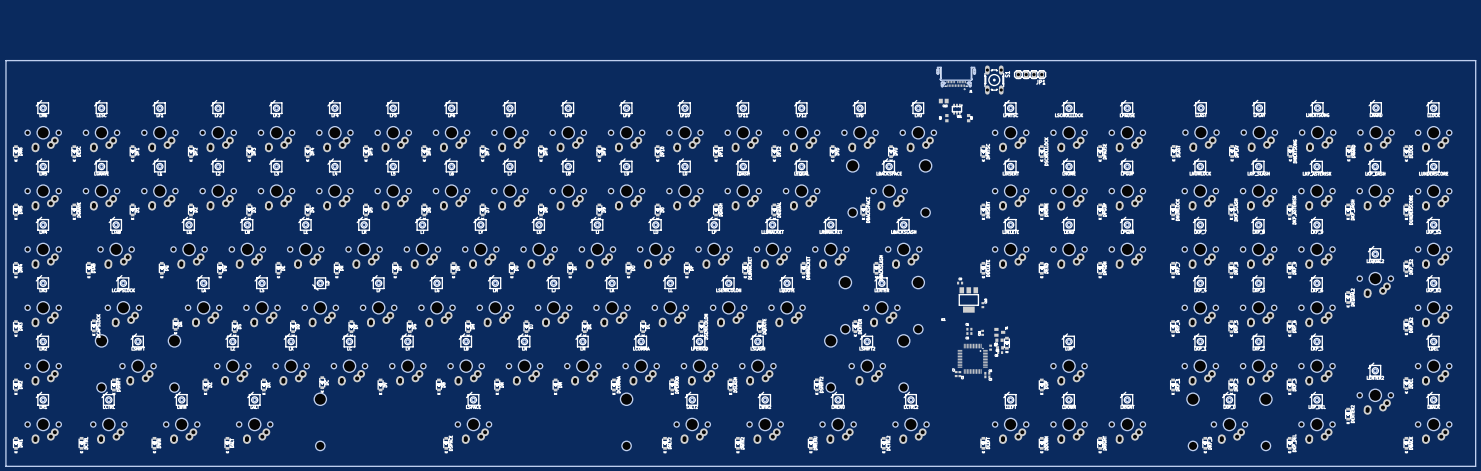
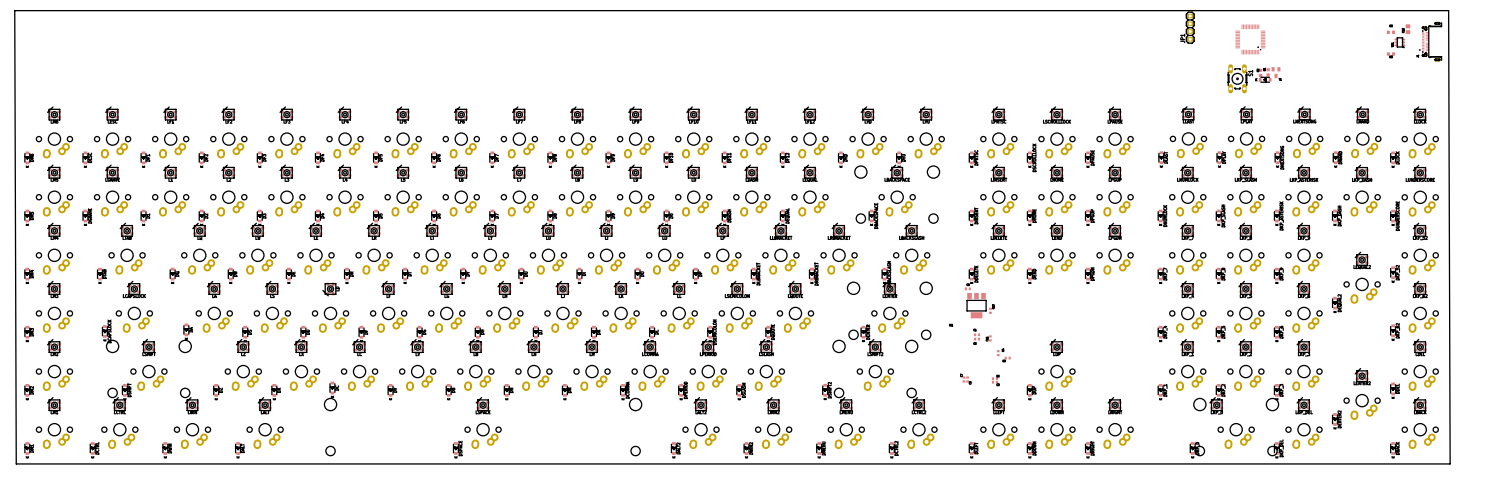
part: none -> (1250, 39)
board edge: (5, 60) (1475, 60) (1475, 466) (5, 466) (5, 60) -> (14, 10) (16, 463) (1450, 463) (1448, 10) (14, 10)
part: none -> (1265, 79)
part rotation: 0° (1030, 74) -> 90° clockwise (1190, 27)
part position: (1030, 74) -> (1190, 27)
part rotation: 0° (956, 78) -> 90° clockwise (1430, 41)
part position: (956, 78) -> (1430, 41)
part position: (994, 80) -> (1237, 78)
part footprint: [36, 100, 49, 114] -> [47, 106, 61, 121]
part footprint: [94, 100, 108, 114] -> [105, 106, 119, 121]
part footprint: [152, 100, 166, 114] -> [163, 106, 178, 121]
part footprint: [211, 100, 224, 114] -> [221, 106, 236, 121]
part footprint: [269, 100, 283, 114] -> [279, 106, 294, 121]
part footprint: [327, 100, 341, 114] -> [337, 106, 352, 121]
part footprint: [386, 100, 399, 114] -> [396, 106, 410, 121]
part footprint: [444, 100, 458, 114] -> [454, 106, 468, 121]
part footprint: [502, 100, 516, 114] -> [512, 106, 526, 121]
part footprint: [561, 100, 574, 114] -> [570, 106, 584, 121]
part footprint: [619, 100, 633, 114] -> [628, 106, 643, 121]
part footprint: [677, 100, 691, 114] -> [686, 106, 701, 121]
part footprint: [736, 100, 749, 114] -> [744, 106, 759, 121]
part footprint: [794, 100, 808, 114] -> [802, 106, 817, 121]
part footprint: [852, 100, 866, 114] -> [861, 106, 875, 121]
part footprint: [911, 100, 924, 114] -> [919, 106, 933, 121]
part rotation: 0° (943, 101) -> 90° clockwise (1407, 29)
part position: (943, 101) -> (1407, 29)
part: none -> (1188, 113)
part: (1200, 106) -> none
part: none -> (1246, 113)
part: (1258, 106) -> none
part: none -> (1304, 113)
part: (1316, 106) -> none
part: none -> (1362, 113)
part: (1375, 106) -> none
part: none -> (998, 113)
part: (1009, 107) -> none
part: none -> (1056, 113)
part: (1068, 107) -> none
part: none -> (1114, 113)
part: (1126, 107) -> none
part: none -> (1419, 113)
part: (1432, 107) -> none
part rotation: 0° (957, 109) -> 90° clockwise (1399, 42)
part position: (957, 109) -> (1399, 42)
part rotation: 0° (946, 118) -> 90° clockwise (1390, 32)
part position: (946, 118) -> (1390, 32)
part rotation: 0° (968, 118) -> 90° clockwise (1390, 54)
part position: (968, 118) -> (1390, 54)
part: none -> (998, 145)
part: (1010, 139) -> none
part: none -> (1056, 145)
part: (1069, 139) -> none
part: none -> (1115, 145)
part: (1127, 139) -> none
part: none -> (1188, 145)
part: (1201, 139) -> none
part: none -> (1246, 145)
part: (1259, 139) -> none
part: none -> (1304, 145)
part: (1317, 139) -> none
part: none -> (1362, 145)
part: (1376, 139) -> none
part: none -> (1420, 145)
part: (1433, 139) -> none
part position: (983, 151) -> (971, 157)
part position: (1041, 151) -> (1029, 157)
part position: (1100, 151) -> (1087, 157)
part position: (1173, 151) -> (1161, 157)
part position: (1232, 151) -> (1219, 157)
part position: (1290, 151) -> (1277, 157)
part position: (1348, 151) -> (1335, 157)
part position: (1406, 151) -> (1393, 157)
part footprint: [36, 158, 49, 173] -> [47, 164, 61, 179]
part footprint: [94, 158, 108, 173] -> [105, 164, 119, 179]
part footprint: [152, 158, 166, 173] -> [163, 164, 178, 179]
part footprint: [211, 158, 224, 173] -> [221, 164, 236, 179]
part footprint: [269, 158, 283, 173] -> [279, 164, 294, 179]
part footprint: [327, 158, 341, 173] -> [337, 164, 352, 179]
part footprint: [386, 158, 399, 173] -> [396, 164, 410, 179]
part footprint: [444, 158, 458, 173] -> [454, 164, 468, 179]
part footprint: [502, 158, 516, 173] -> [512, 164, 526, 179]
part footprint: [561, 158, 574, 173] -> [570, 164, 584, 179]
part footprint: [619, 158, 633, 173] -> [628, 164, 643, 179]
part footprint: [677, 158, 691, 173] -> [686, 164, 701, 179]
part footprint: [736, 158, 749, 173] -> [744, 164, 759, 179]
part footprint: [794, 158, 808, 173] -> [802, 164, 817, 179]
part footprint: [882, 158, 895, 173] -> [890, 164, 904, 179]
part: none -> (998, 171)
part: (1009, 165) -> none
part: none -> (1056, 171)
part: (1068, 165) -> none
part: none -> (1114, 171)
part: (1126, 165) -> none
part: none -> (1187, 171)
part: (1199, 165) -> none
part: none -> (1245, 171)
part: (1257, 165) -> none
part: none -> (1303, 171)
part: (1316, 165) -> none
part: none -> (1361, 171)
part: (1374, 165) -> none
part: none -> (1419, 171)
part: (1432, 165) -> none
part: none -> (998, 203)
part: (1010, 197) -> none
part: none -> (1056, 203)
part: (1069, 197) -> none
part: none -> (1115, 203)
part: (1127, 197) -> none
part: none -> (1187, 203)
part: (1200, 197) -> none
part: none -> (1245, 203)
part: (1258, 197) -> none
part: none -> (1304, 203)
part: (1316, 197) -> none
part: none -> (1362, 203)
part: (1375, 197) -> none
part: none -> (1420, 203)
part: (1433, 197) -> none
part position: (983, 209) -> (971, 216)
part position: (1041, 209) -> (1029, 216)
part position: (1100, 209) -> (1087, 216)
part position: (1173, 209) -> (1160, 216)
part position: (1231, 209) -> (1218, 216)
part position: (1289, 209) -> (1276, 216)
part position: (1348, 209) -> (1334, 216)
part position: (1406, 210) -> (1393, 216)
part footprint: [36, 217, 49, 231] -> [47, 223, 61, 237]
part footprint: [109, 217, 122, 231] -> [120, 223, 134, 237]
part footprint: [181, 217, 195, 231] -> [192, 223, 207, 237]
part footprint: [240, 217, 253, 231] -> [250, 223, 265, 237]
part footprint: [298, 217, 312, 231] -> [308, 223, 323, 237]
part footprint: [357, 217, 370, 231] -> [367, 223, 381, 237]
part footprint: [415, 217, 428, 231] -> [425, 223, 439, 237]
part footprint: [473, 217, 487, 231] -> [483, 223, 497, 237]
part footprint: [532, 217, 545, 231] -> [541, 223, 555, 237]
part footprint: [590, 217, 603, 231] -> [599, 223, 613, 237]
part footprint: [648, 217, 662, 231] -> [657, 223, 672, 237]
part footprint: [707, 217, 720, 231] -> [715, 223, 730, 237]
part footprint: [765, 217, 778, 231] -> [773, 223, 788, 237]
part footprint: [823, 217, 837, 231] -> [832, 223, 846, 237]
part footprint: [896, 217, 910, 231] -> [904, 223, 919, 237]
part footprint: [1193, 217, 1206, 231] -> [1180, 223, 1195, 237]
part footprint: [1251, 217, 1265, 231] -> [1238, 223, 1253, 237]
part footprint: [1309, 217, 1323, 231] -> [1296, 223, 1311, 237]
part footprint: [1426, 217, 1440, 231] -> [1413, 223, 1427, 237]
part: none -> (998, 229)
part: (1009, 223) -> none
part: none -> (1056, 229)
part: (1068, 223) -> none
part: none -> (1114, 229)
part: (1126, 223) -> none
part footprint: [1368, 246, 1381, 260] -> [1355, 252, 1369, 266]
part: none -> (998, 261)
part: (1010, 256) -> none
part: none -> (1056, 261)
part: (1069, 256) -> none
part: none -> (1115, 261)
part: (1127, 256) -> none
part: none -> (1187, 261)
part: (1200, 256) -> none
part: none -> (1245, 261)
part: (1258, 256) -> none
part: none -> (1304, 261)
part: (1316, 256) -> none
part position: (1433, 256) -> (1420, 261)
part position: (1406, 266) -> (1393, 272)
part position: (983, 268) -> (971, 274)
part position: (1041, 268) -> (1029, 274)
part position: (1100, 268) -> (1087, 274)
part position: (1173, 268) -> (1160, 274)
part position: (1231, 268) -> (1218, 274)
part position: (1289, 268) -> (1276, 274)
part footprint: [36, 275, 49, 289] -> [47, 281, 61, 295]
part footprint: [116, 275, 129, 289] -> [127, 281, 141, 295]
part footprint: [196, 275, 210, 289] -> [207, 281, 221, 295]
part footprint: [254, 275, 268, 289] -> [265, 281, 279, 295]
part footprint: [371, 275, 385, 289] -> [381, 281, 396, 295]
part footprint: [429, 275, 443, 289] -> [439, 281, 454, 295]
part footprint: [488, 275, 501, 289] -> [497, 281, 512, 295]
part footprint: [546, 275, 560, 289] -> [555, 281, 570, 295]
part footprint: [604, 275, 618, 289] -> [614, 281, 628, 295]
part footprint: [663, 275, 676, 289] -> [672, 281, 686, 295]
part footprint: [721, 275, 735, 289] -> [730, 281, 744, 295]
part footprint: [779, 275, 793, 289] -> [788, 281, 802, 295]
part footprint: [874, 275, 888, 289] -> [882, 281, 897, 295]
part footprint: [1193, 275, 1206, 289] -> [1180, 281, 1195, 295]
part footprint: [1251, 275, 1265, 289] -> [1238, 281, 1253, 295]
part footprint: [1309, 275, 1323, 289] -> [1296, 281, 1311, 295]
part footprint: [1426, 275, 1440, 289] -> [1413, 281, 1427, 295]
part footprint: [312, 277, 326, 291] -> [322, 282, 336, 297]
part position: (1375, 285) -> (1362, 291)
part position: (1348, 297) -> (1334, 303)
part: none -> (1187, 320)
part: (1200, 314) -> none
part: none -> (1245, 320)
part: (1258, 314) -> none
part: none -> (1304, 320)
part: (1316, 314) -> none
part position: (1433, 314) -> (1420, 320)
part position: (1406, 325) -> (1393, 330)
part position: (1173, 326) -> (1160, 332)
part position: (1231, 326) -> (1218, 332)
part position: (1289, 326) -> (1276, 332)
part rotation: 0° (999, 332) -> 90° clockwise (1276, 72)
part position: (999, 332) -> (1276, 72)
part footprint: [36, 333, 49, 348] -> [47, 339, 61, 353]
part footprint: [130, 333, 144, 348] -> [141, 339, 156, 353]
part footprint: [225, 333, 239, 348] -> [236, 339, 250, 353]
part footprint: [284, 333, 297, 348] -> [294, 339, 308, 353]
part footprint: [342, 333, 355, 348] -> [352, 339, 366, 353]
part footprint: [400, 333, 414, 348] -> [410, 339, 425, 353]
part footprint: [459, 333, 472, 348] -> [468, 339, 483, 353]
part footprint: [517, 333, 530, 348] -> [526, 339, 541, 353]
part footprint: [575, 333, 589, 348] -> [584, 339, 599, 353]
part footprint: [634, 333, 647, 348] -> [643, 339, 657, 353]
part footprint: [692, 333, 706, 348] -> [701, 339, 715, 353]
part footprint: [750, 333, 764, 348] -> [759, 339, 773, 353]
part footprint: [860, 333, 873, 348] -> [868, 339, 882, 353]
part footprint: [1193, 333, 1206, 348] -> [1180, 339, 1195, 353]
part footprint: [1251, 333, 1265, 348] -> [1238, 339, 1253, 353]
part footprint: [1309, 333, 1323, 348] -> [1296, 339, 1311, 353]
part rotation: 0° (999, 340) -> 90° clockwise (1268, 72)
part position: (999, 340) -> (1268, 72)
part: none -> (1056, 345)
part: (1068, 340) -> none
part: none -> (1419, 345)
part: (1432, 340) -> none
part: (1006, 343) -> none
part rotation: 0° (1000, 347) -> 90° clockwise (1260, 72)
part position: (1000, 347) -> (1260, 72)
part: (972, 358) -> none
part footprint: [1368, 362, 1381, 377] -> [1355, 368, 1369, 382]
part position: (1069, 372) -> (1056, 378)
part: none -> (1187, 378)
part: (1200, 372) -> none
part: none -> (1245, 378)
part: (1258, 372) -> none
part: none -> (1304, 378)
part: (1316, 372) -> none
part position: (1433, 372) -> (1420, 378)
part position: (1406, 383) -> (1393, 388)
part position: (1041, 385) -> (1029, 390)
part position: (1173, 385) -> (1160, 390)
part position: (1231, 385) -> (1218, 390)
part position: (1289, 385) -> (1276, 390)
part footprint: [36, 392, 49, 406] -> [47, 397, 61, 411]
part footprint: [101, 392, 115, 406] -> [112, 397, 127, 411]
part footprint: [174, 392, 188, 406] -> [185, 397, 199, 411]
part footprint: [247, 392, 261, 406] -> [258, 397, 272, 411]
part footprint: [466, 392, 479, 406] -> [476, 397, 490, 411]
part footprint: [685, 392, 698, 406] -> [693, 397, 708, 411]
part footprint: [758, 392, 771, 406] -> [766, 397, 781, 411]
part footprint: [831, 392, 844, 406] -> [839, 397, 853, 411]
part footprint: [903, 392, 917, 406] -> [911, 397, 926, 411]
part footprint: [1222, 392, 1235, 406] -> [1209, 397, 1224, 411]
part: none -> (998, 404)
part: (1009, 398) -> none
part: none -> (1056, 404)
part: (1068, 398) -> none
part: none -> (1114, 404)
part: (1126, 398) -> none
part: none -> (1303, 404)
part: (1316, 398) -> none
part: none -> (1419, 404)
part: (1432, 398) -> none
part position: (1375, 401) -> (1362, 407)
part position: (1348, 414) -> (1334, 419)
part: none -> (998, 436)
part: (1010, 431) -> none
part: none -> (1056, 436)
part: (1069, 431) -> none
part: none -> (1115, 436)
part: (1127, 431) -> none
part position: (1316, 431) -> (1304, 436)
part position: (1433, 431) -> (1420, 436)
part position: (983, 443) -> (971, 448)
part position: (1041, 443) -> (1029, 448)
part position: (1100, 443) -> (1087, 448)
part position: (1205, 443) -> (1192, 448)
part position: (1289, 443) -> (1276, 448)
part position: (1406, 443) -> (1393, 448)

